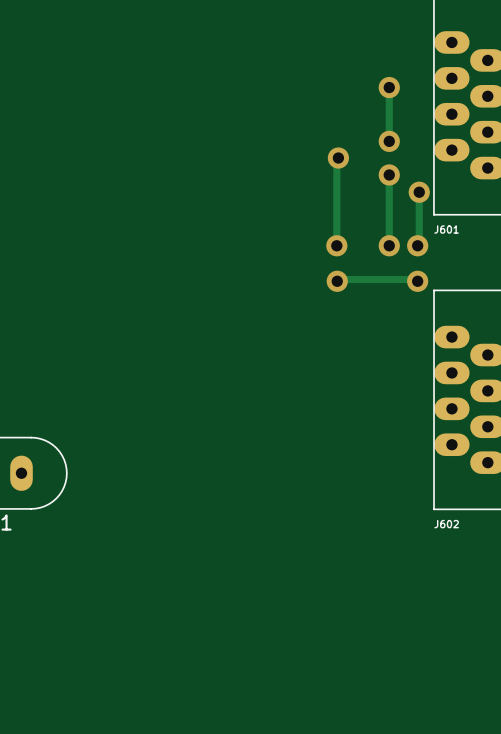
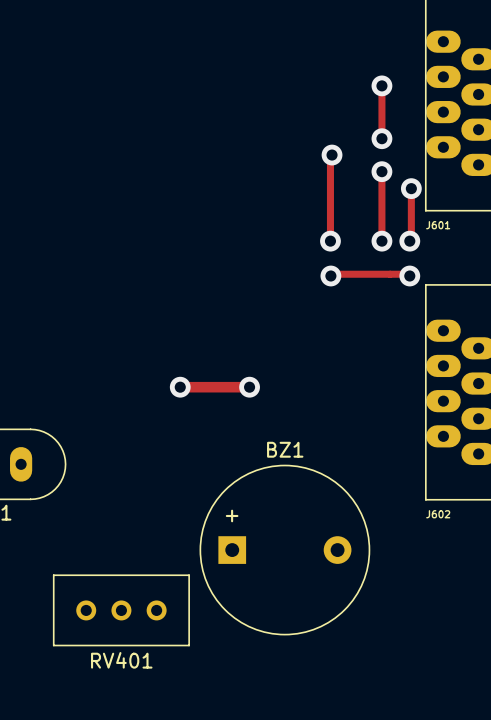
track: none -> (180, 387) (249, 387)
via: none -> (180, 387)
via: none -> (249, 387)
BZ1: none -> (284, 550)
RV401: none -> (121, 610)

